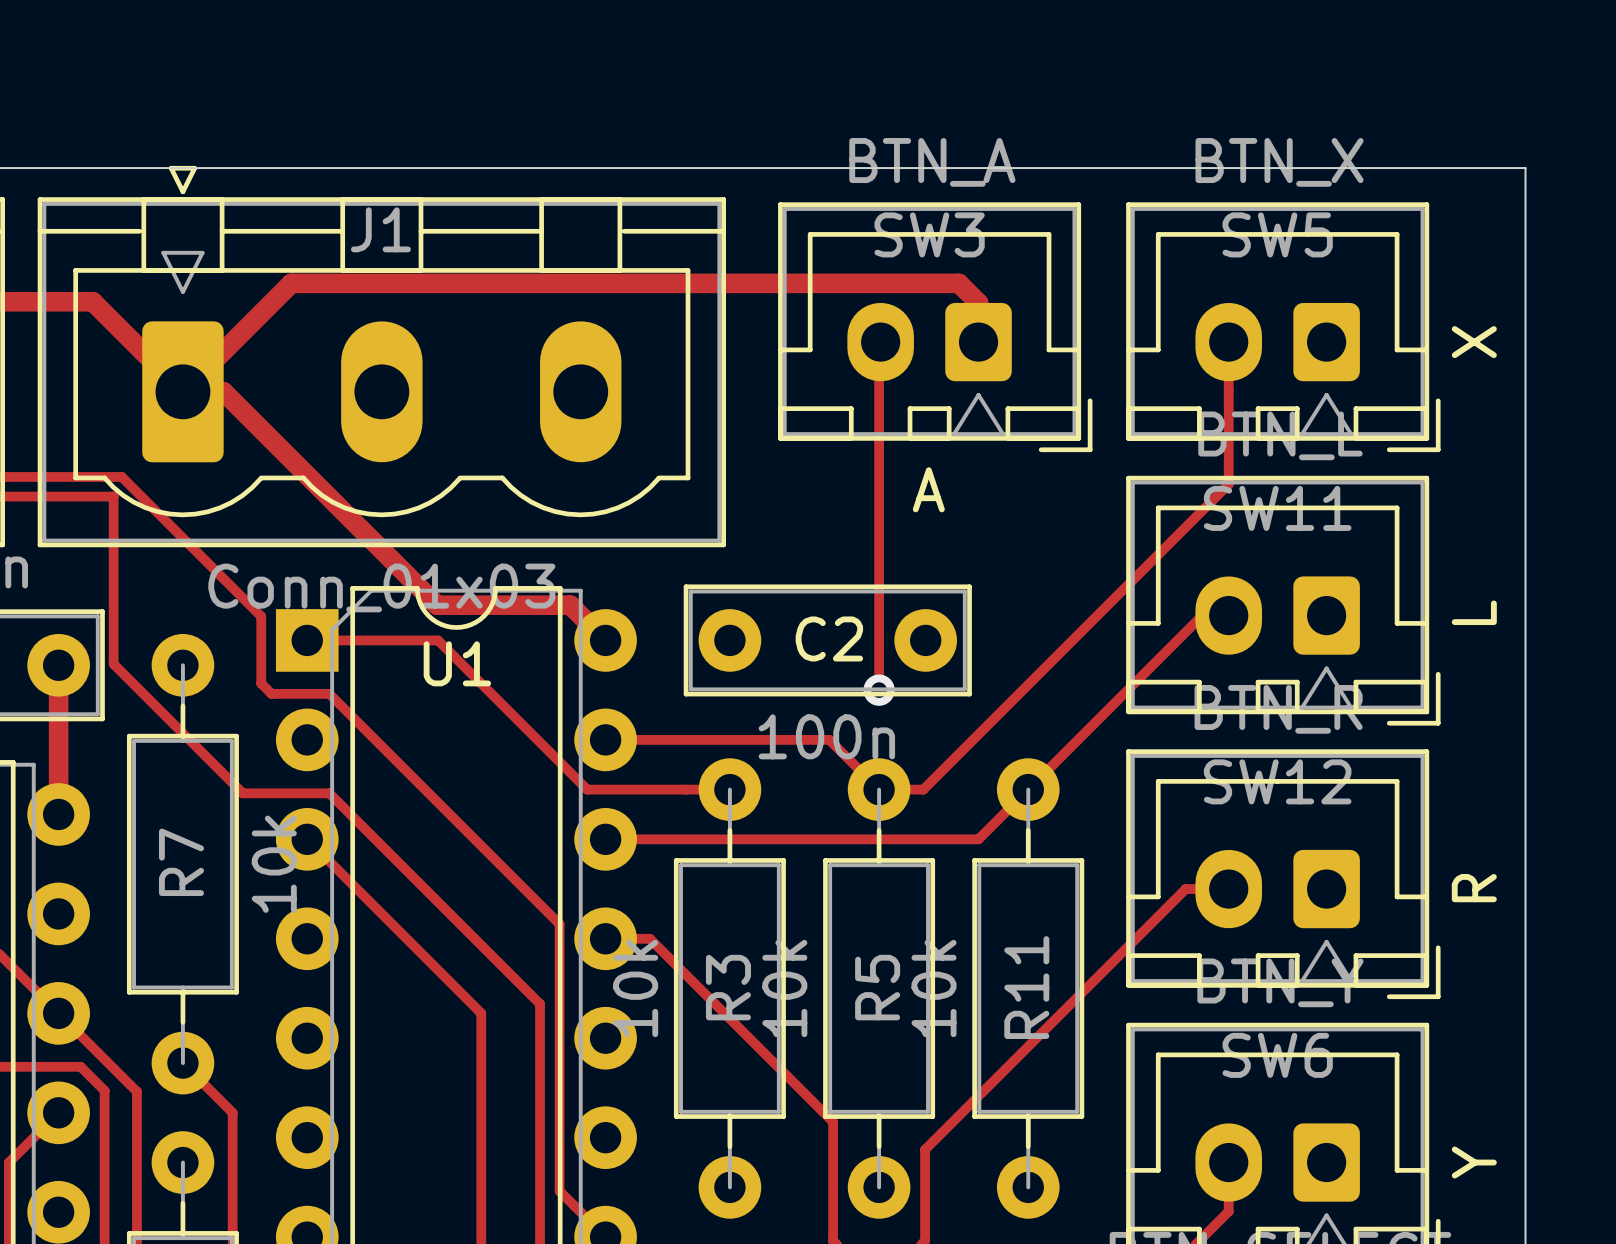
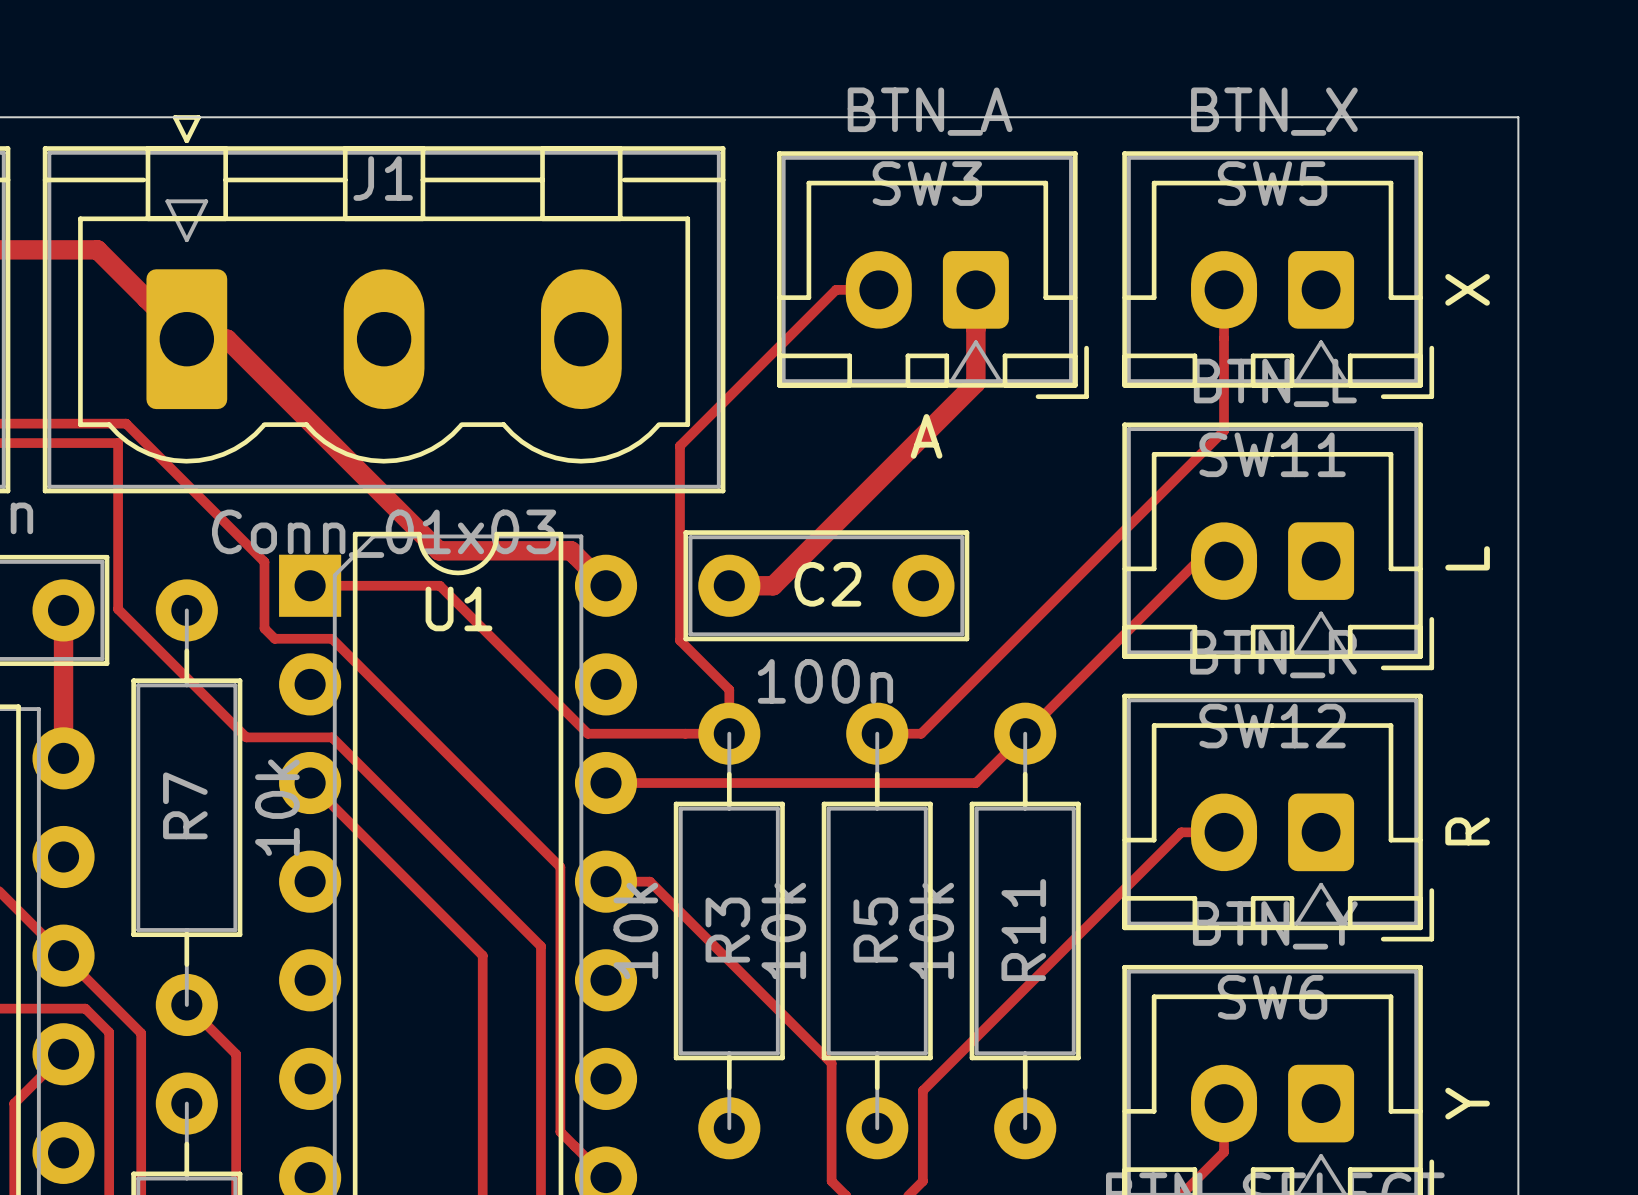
track: (880, 342) (879, 343) (879, 690) -> (878, 289) (836, 289) (679, 445) (679, 640) (729, 689) (729, 733)
track: (978, 342) (978, 302) (958, 283) (291, 283) (182, 391) -> (975, 289) (975, 383) (773, 585) (729, 585)
via: (879, 690) -> none
track: (605, 739) (829, 739) (879, 789) -> none

